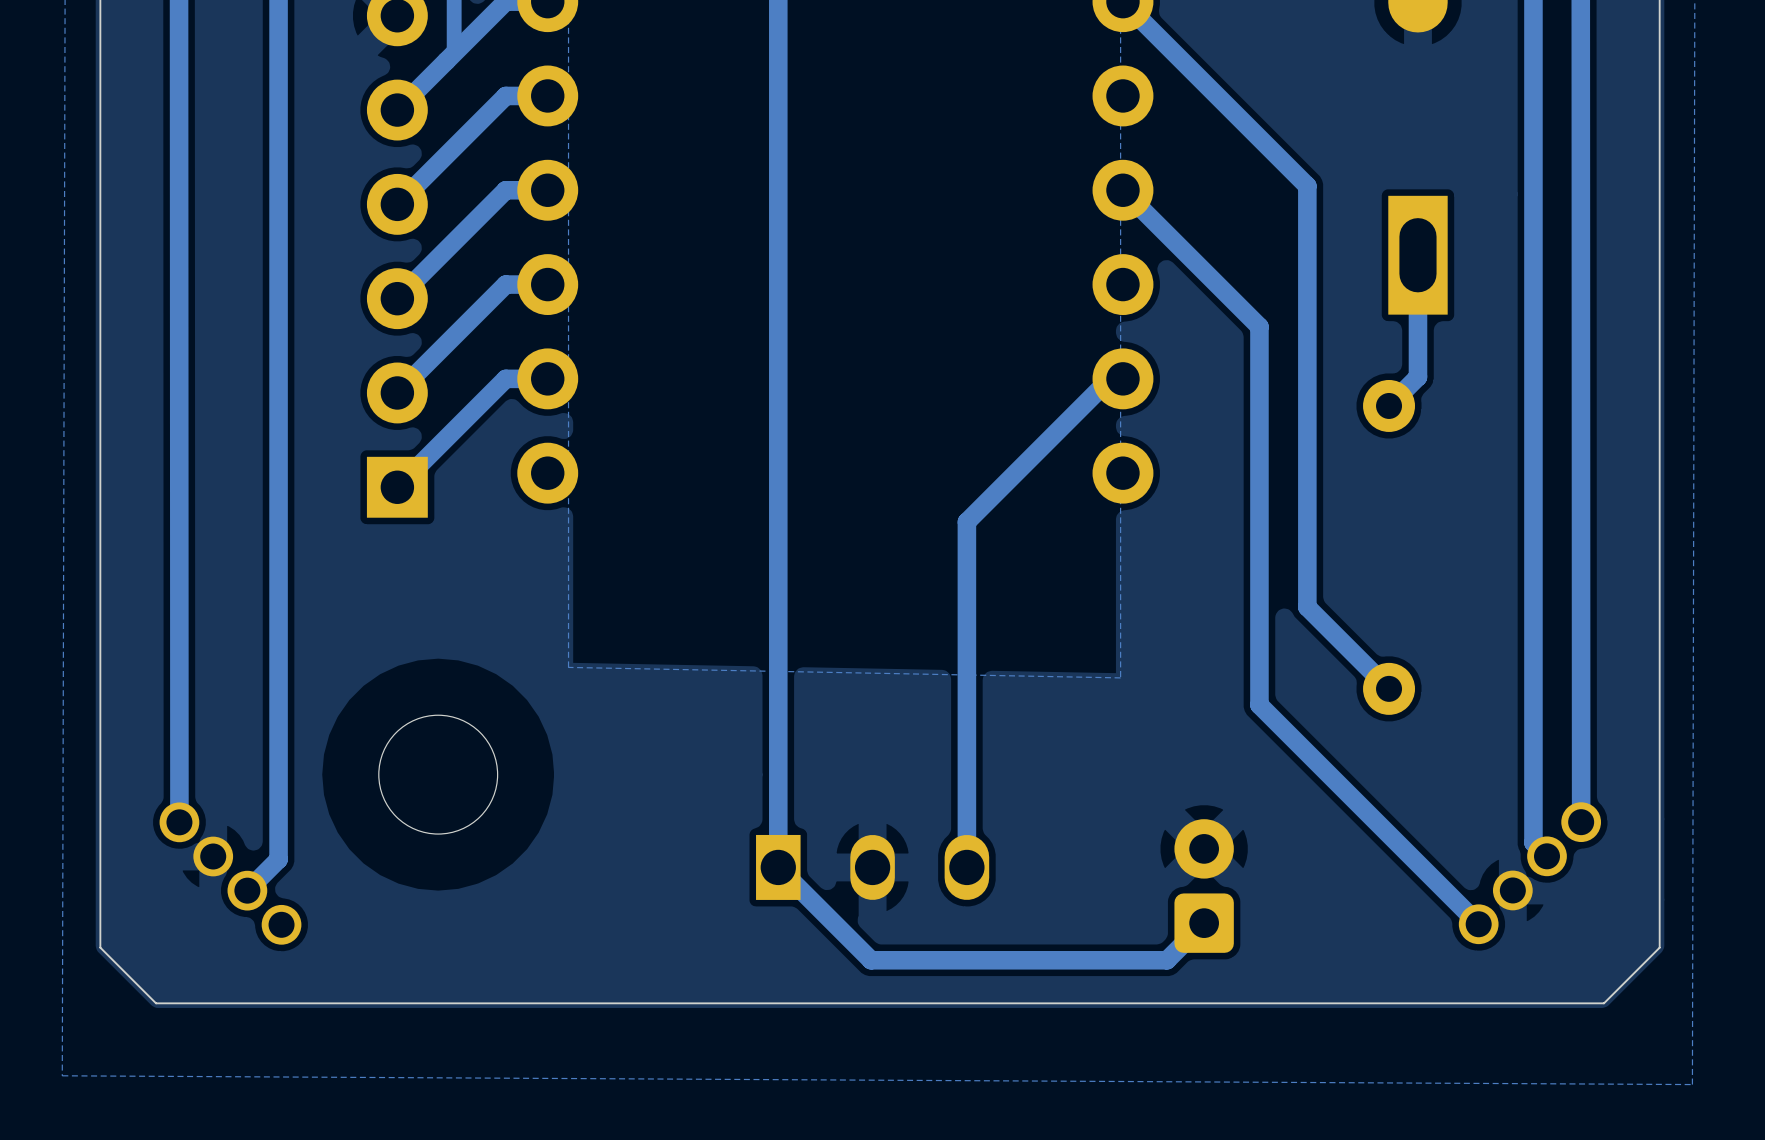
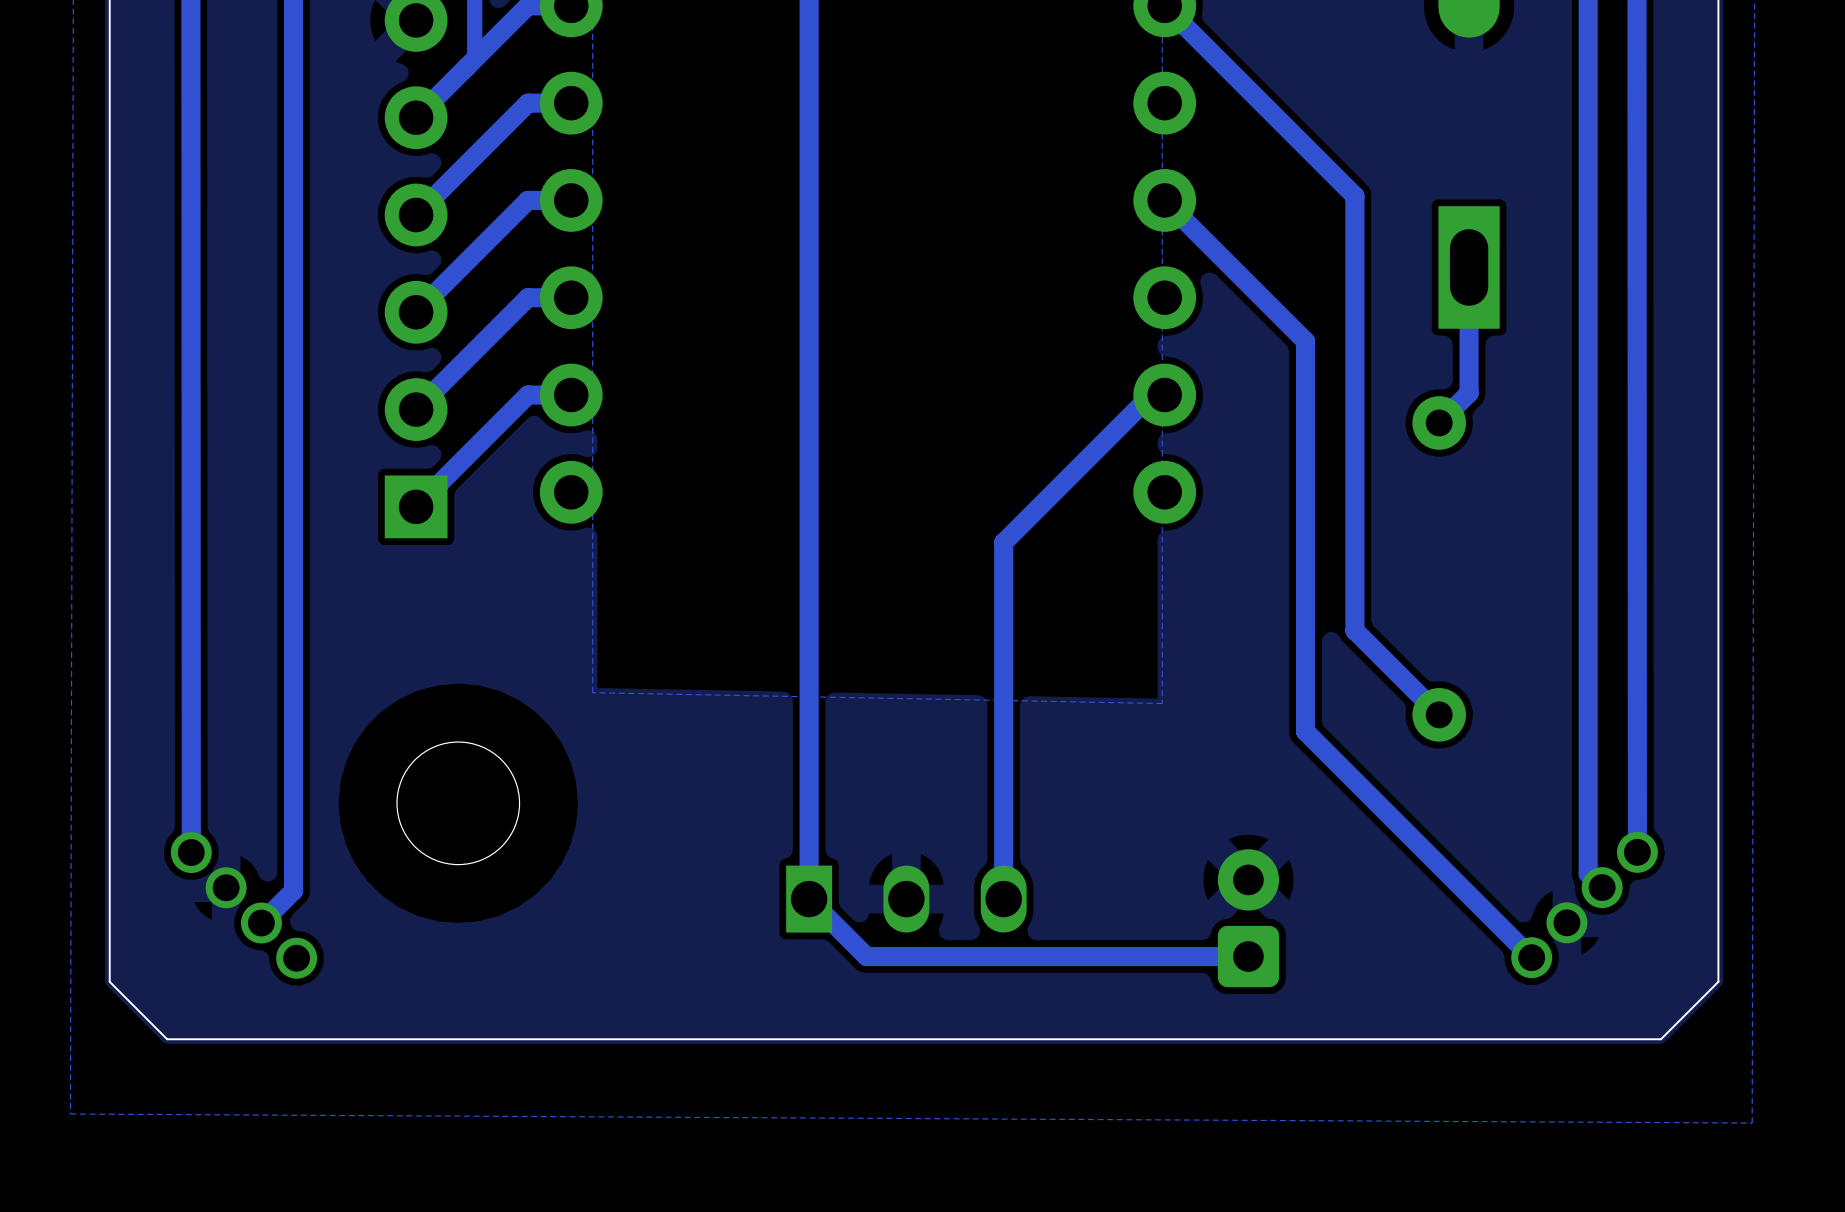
track: (1204, 923) (1167, 960) (871, 960) (833, 923) -> (1248, 956) (866, 956)

